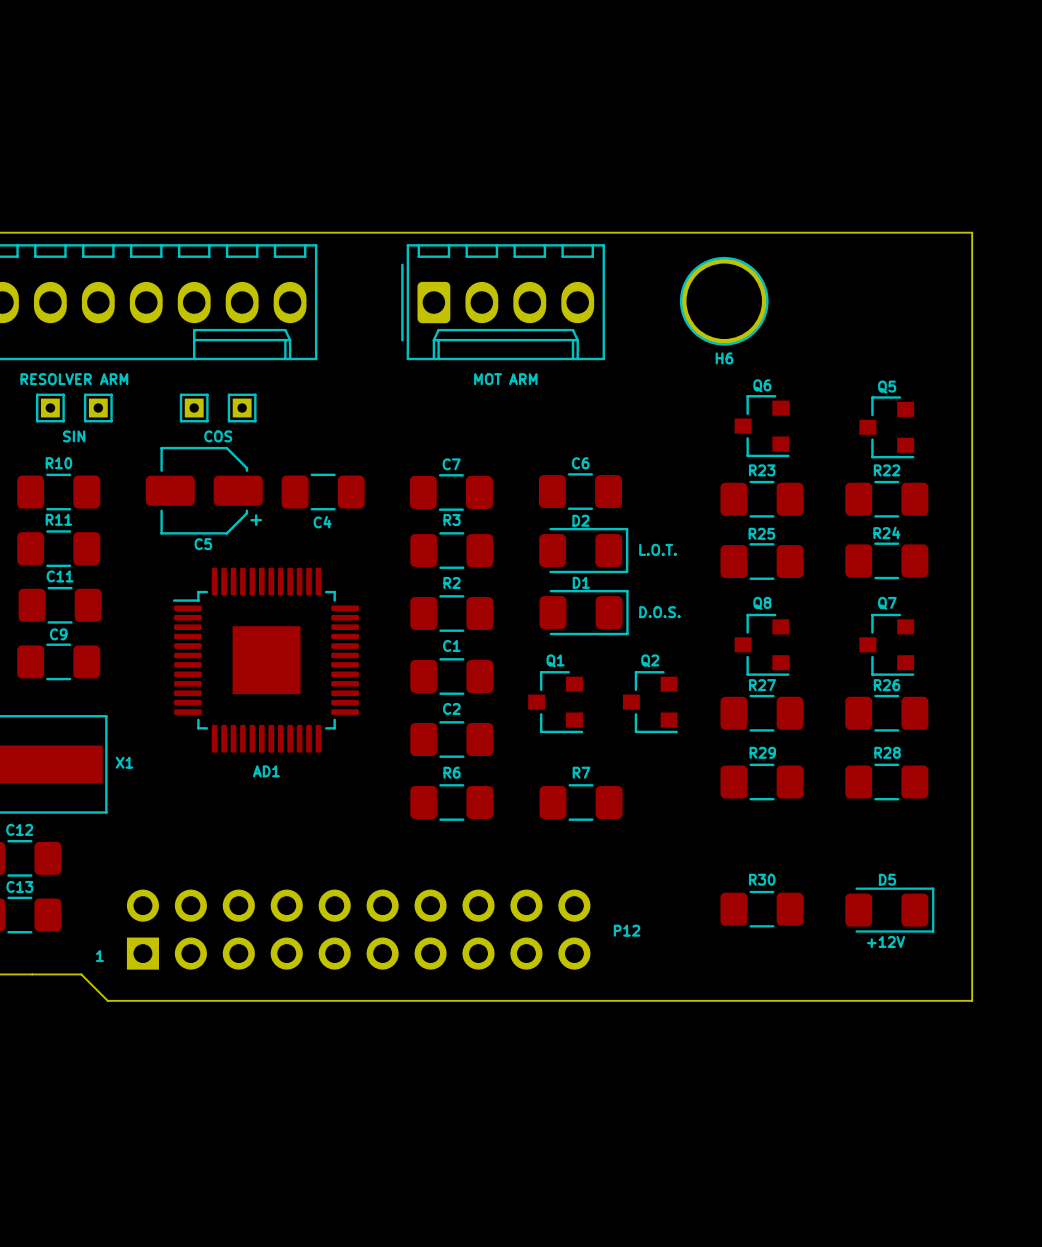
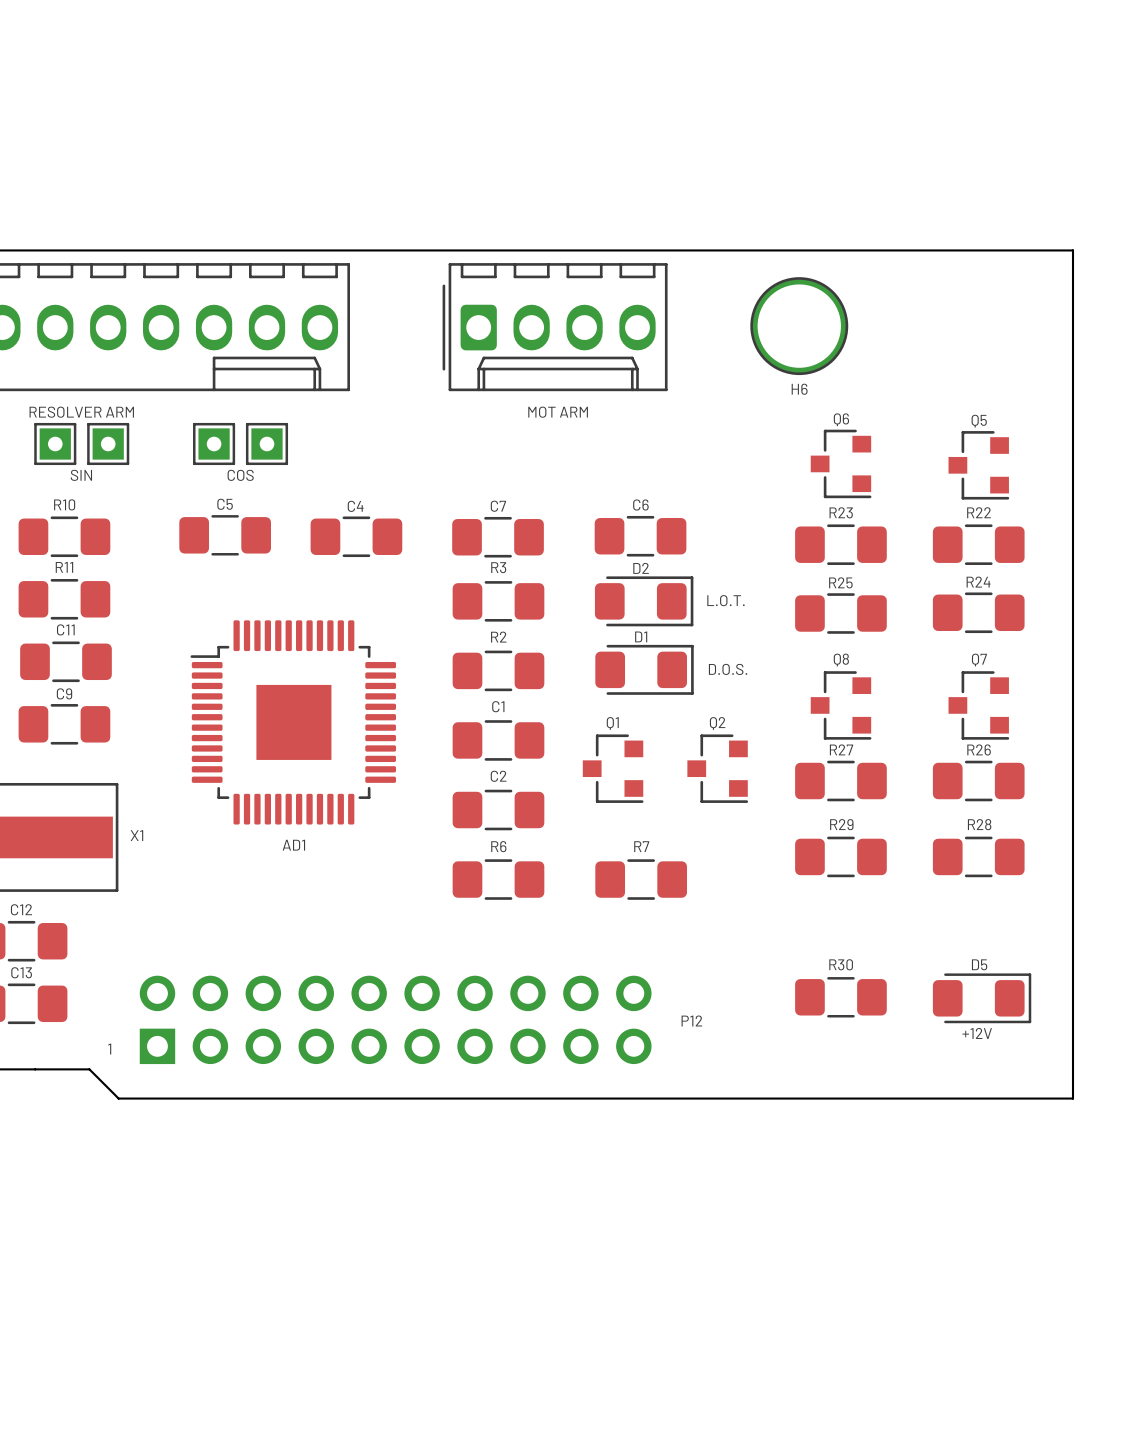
part footprint: [35, 393, 65, 423] -> [34, 422, 77, 466]
part footprint: [83, 393, 113, 423] -> [87, 422, 130, 466]
part footprint: [179, 393, 209, 423] -> [193, 422, 236, 466]
part footprint: [227, 393, 257, 423] -> [245, 422, 289, 466]
C5 footprint: [145, 446, 263, 535] -> [179, 515, 271, 556]
C4 name position: C4 (322, 522) -> C4 (355, 506)
C5 name position: C5 (203, 544) -> C5 (225, 504)

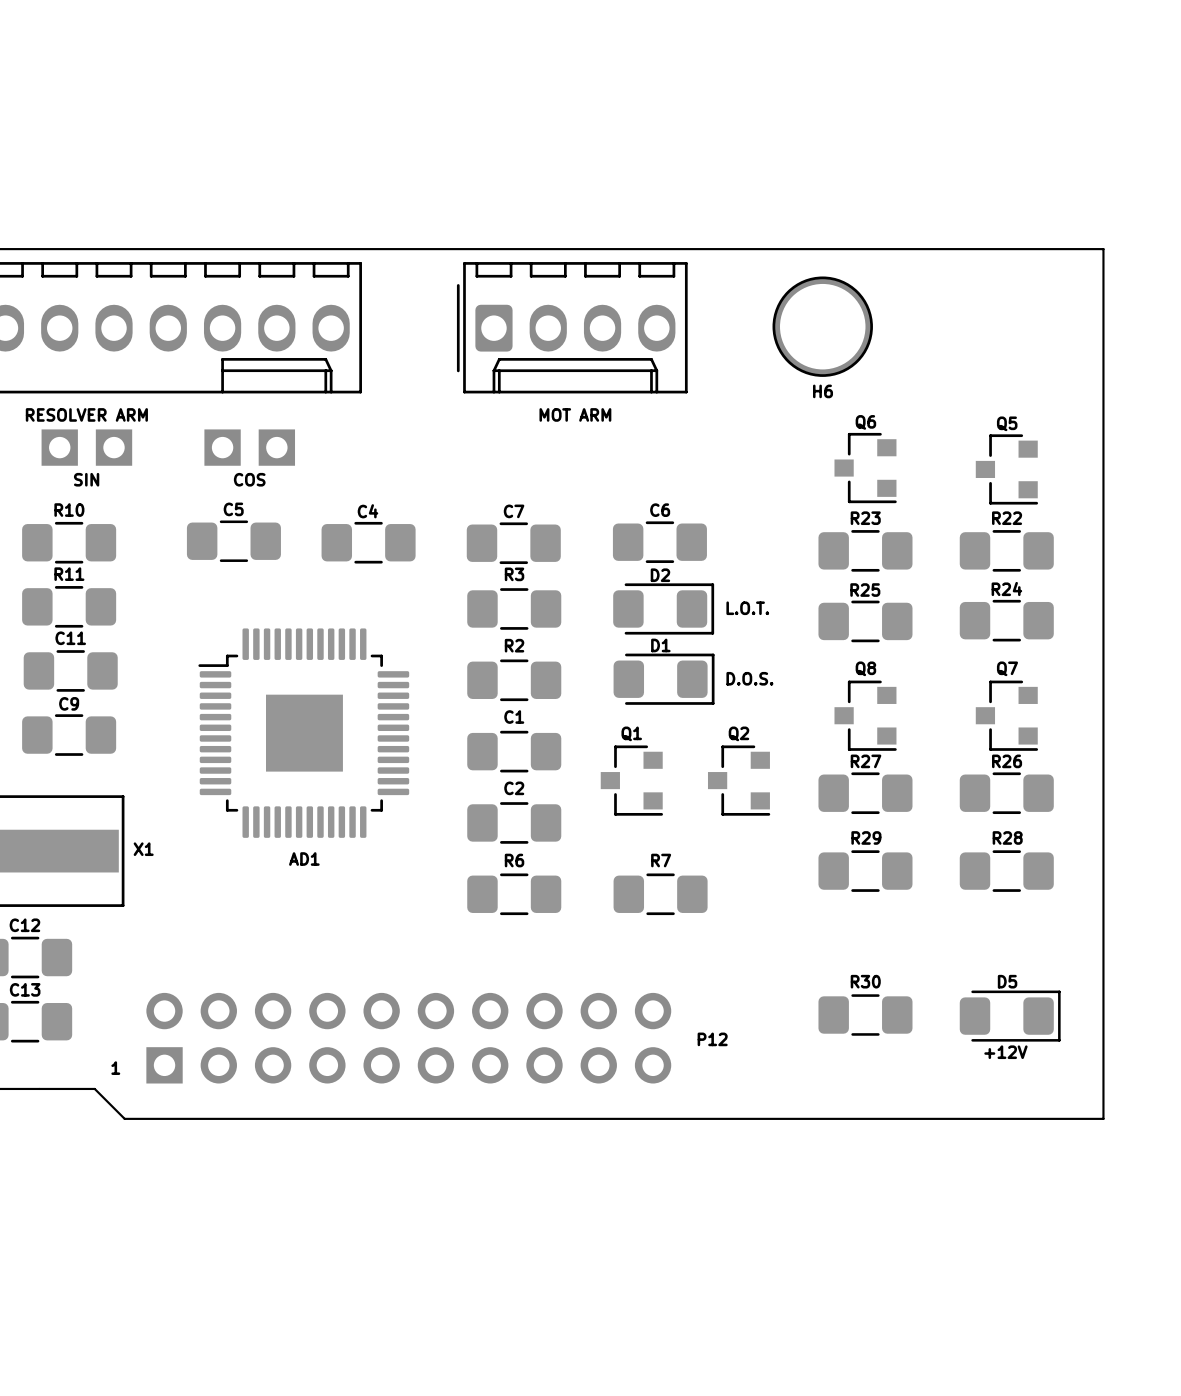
part footprint: [34, 422, 77, 466] -> [41, 429, 78, 466]
part footprint: [87, 422, 130, 466] -> [95, 429, 133, 466]
part footprint: [193, 422, 236, 466] -> [204, 429, 241, 466]
part footprint: [245, 422, 289, 466] -> [258, 429, 296, 466]

